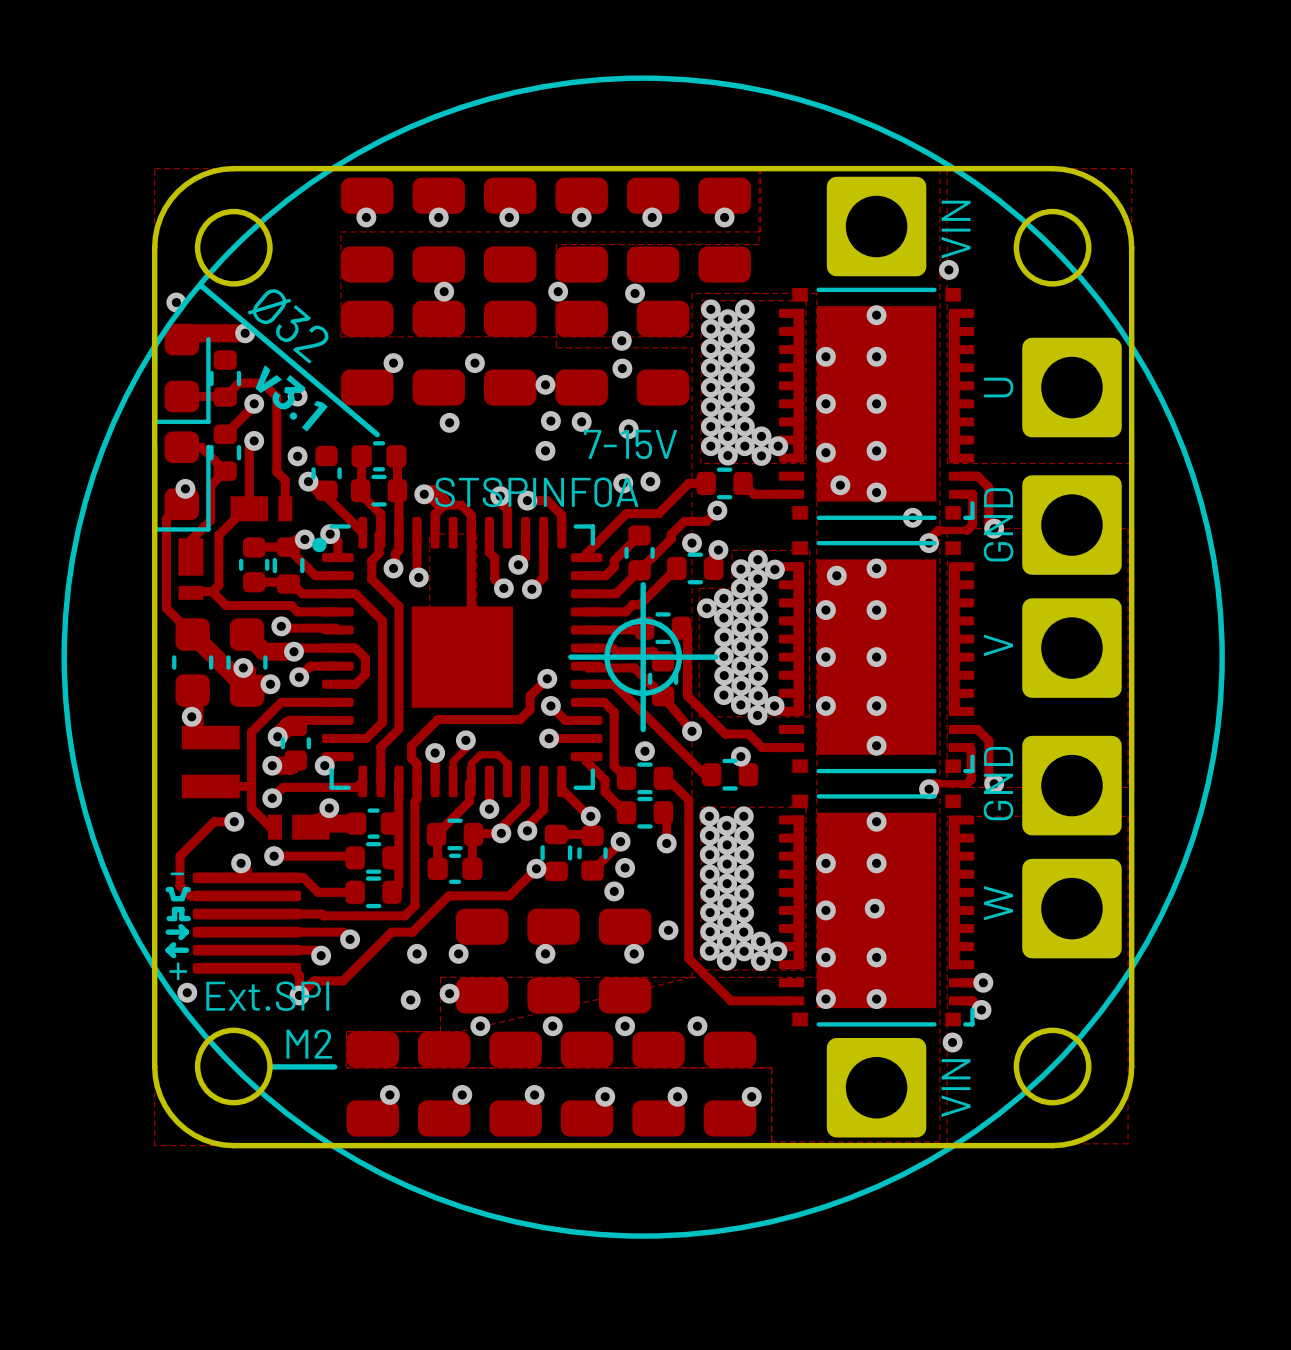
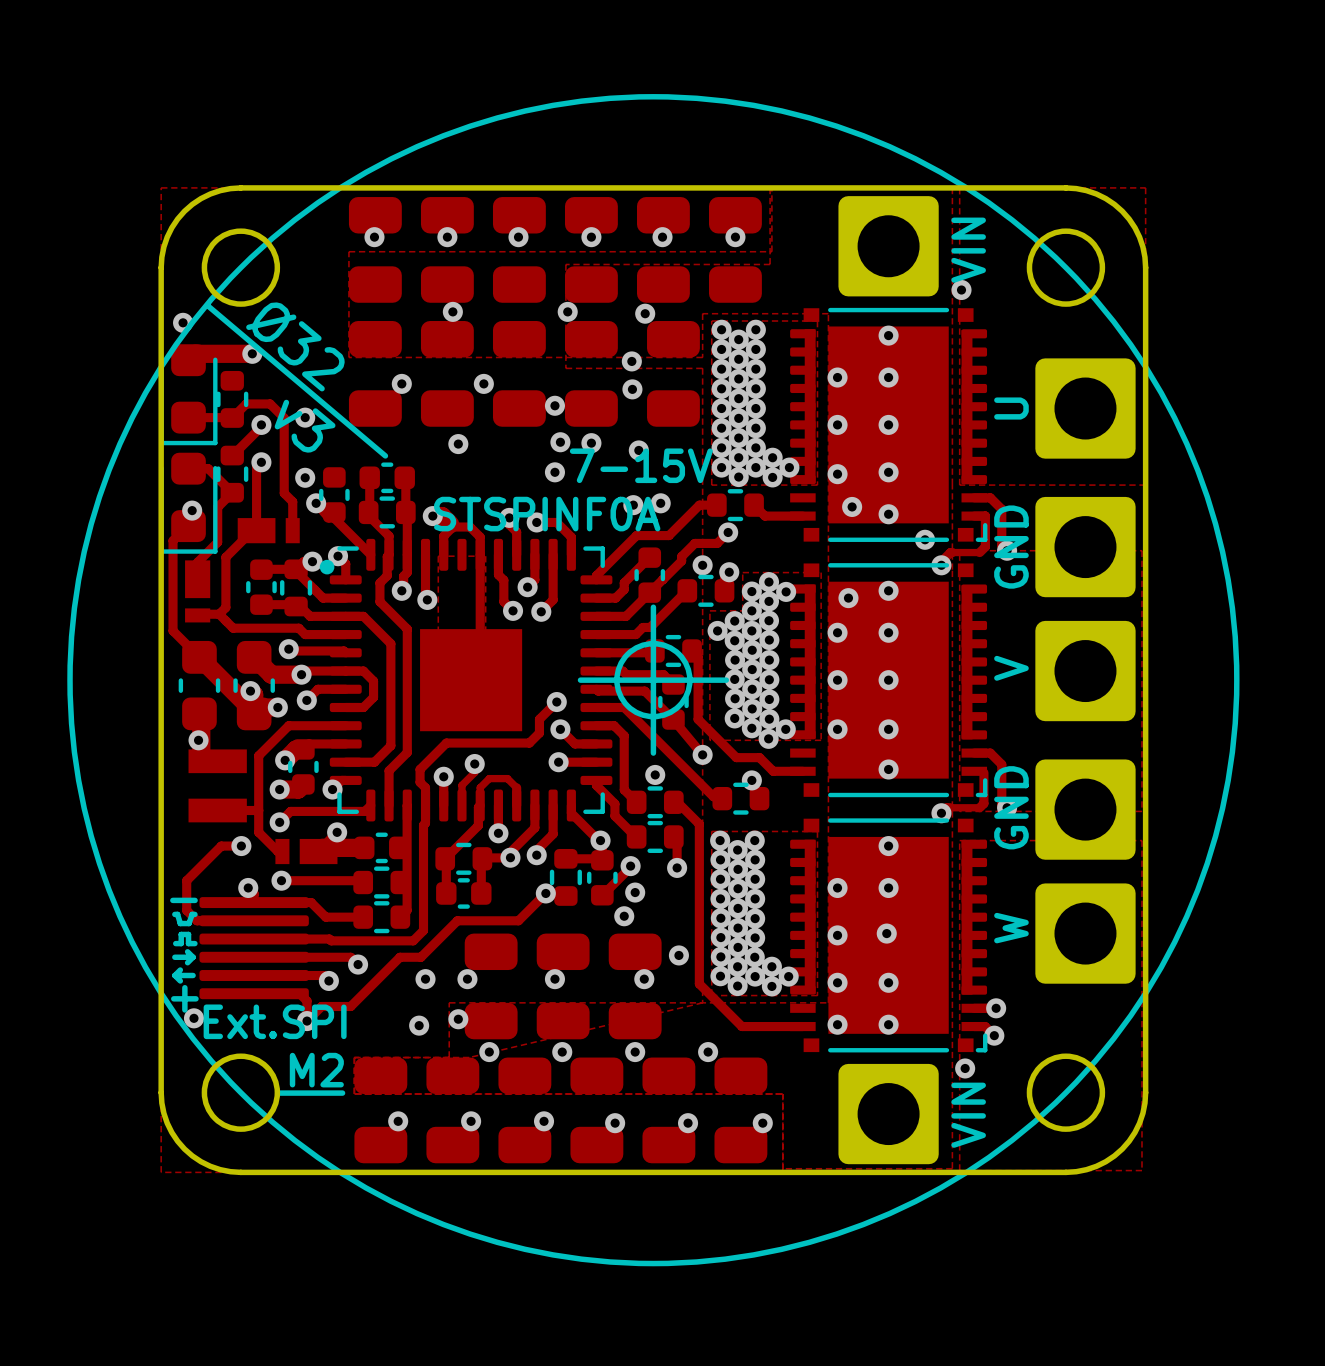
text: v3.1 (291, 398) -> v3 (305, 426)

